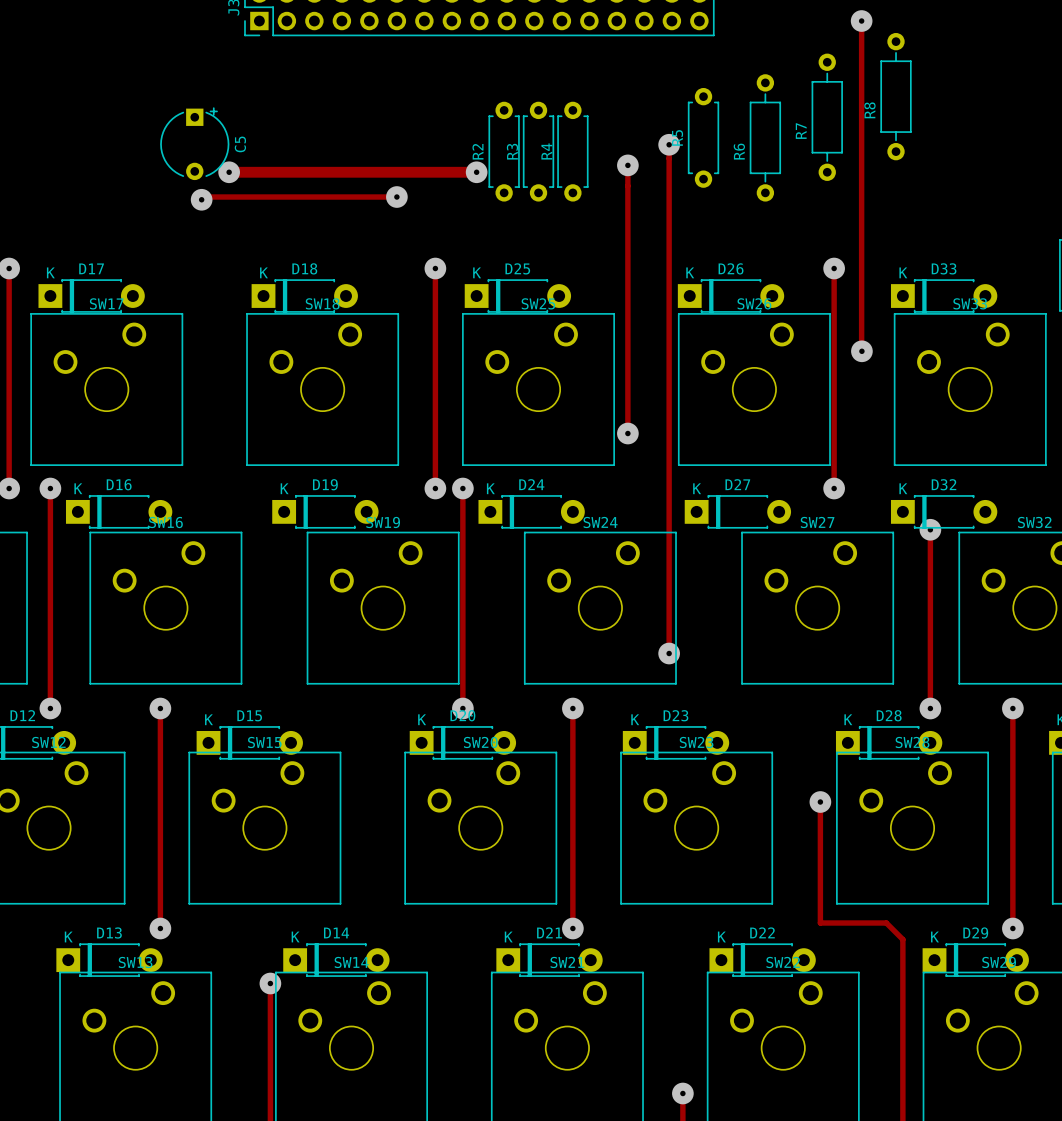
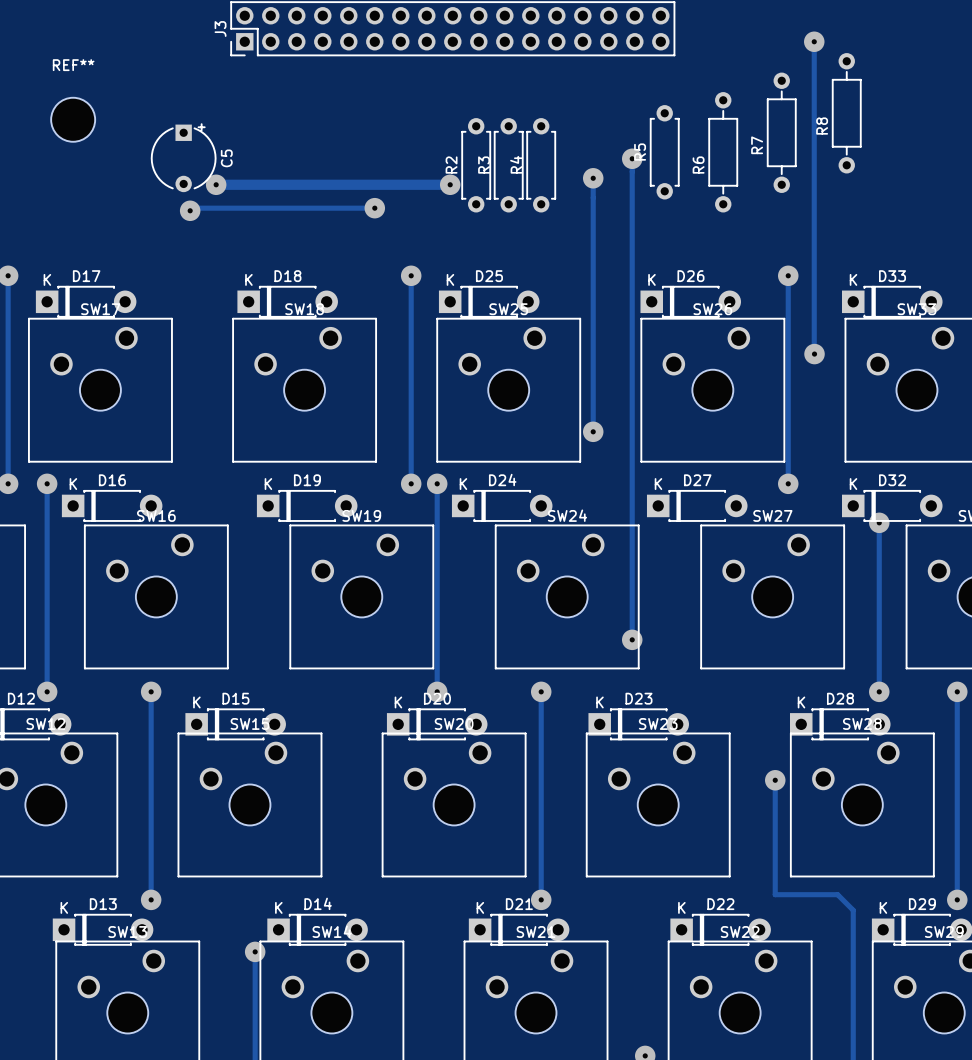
REF**: none -> (73, 119)

